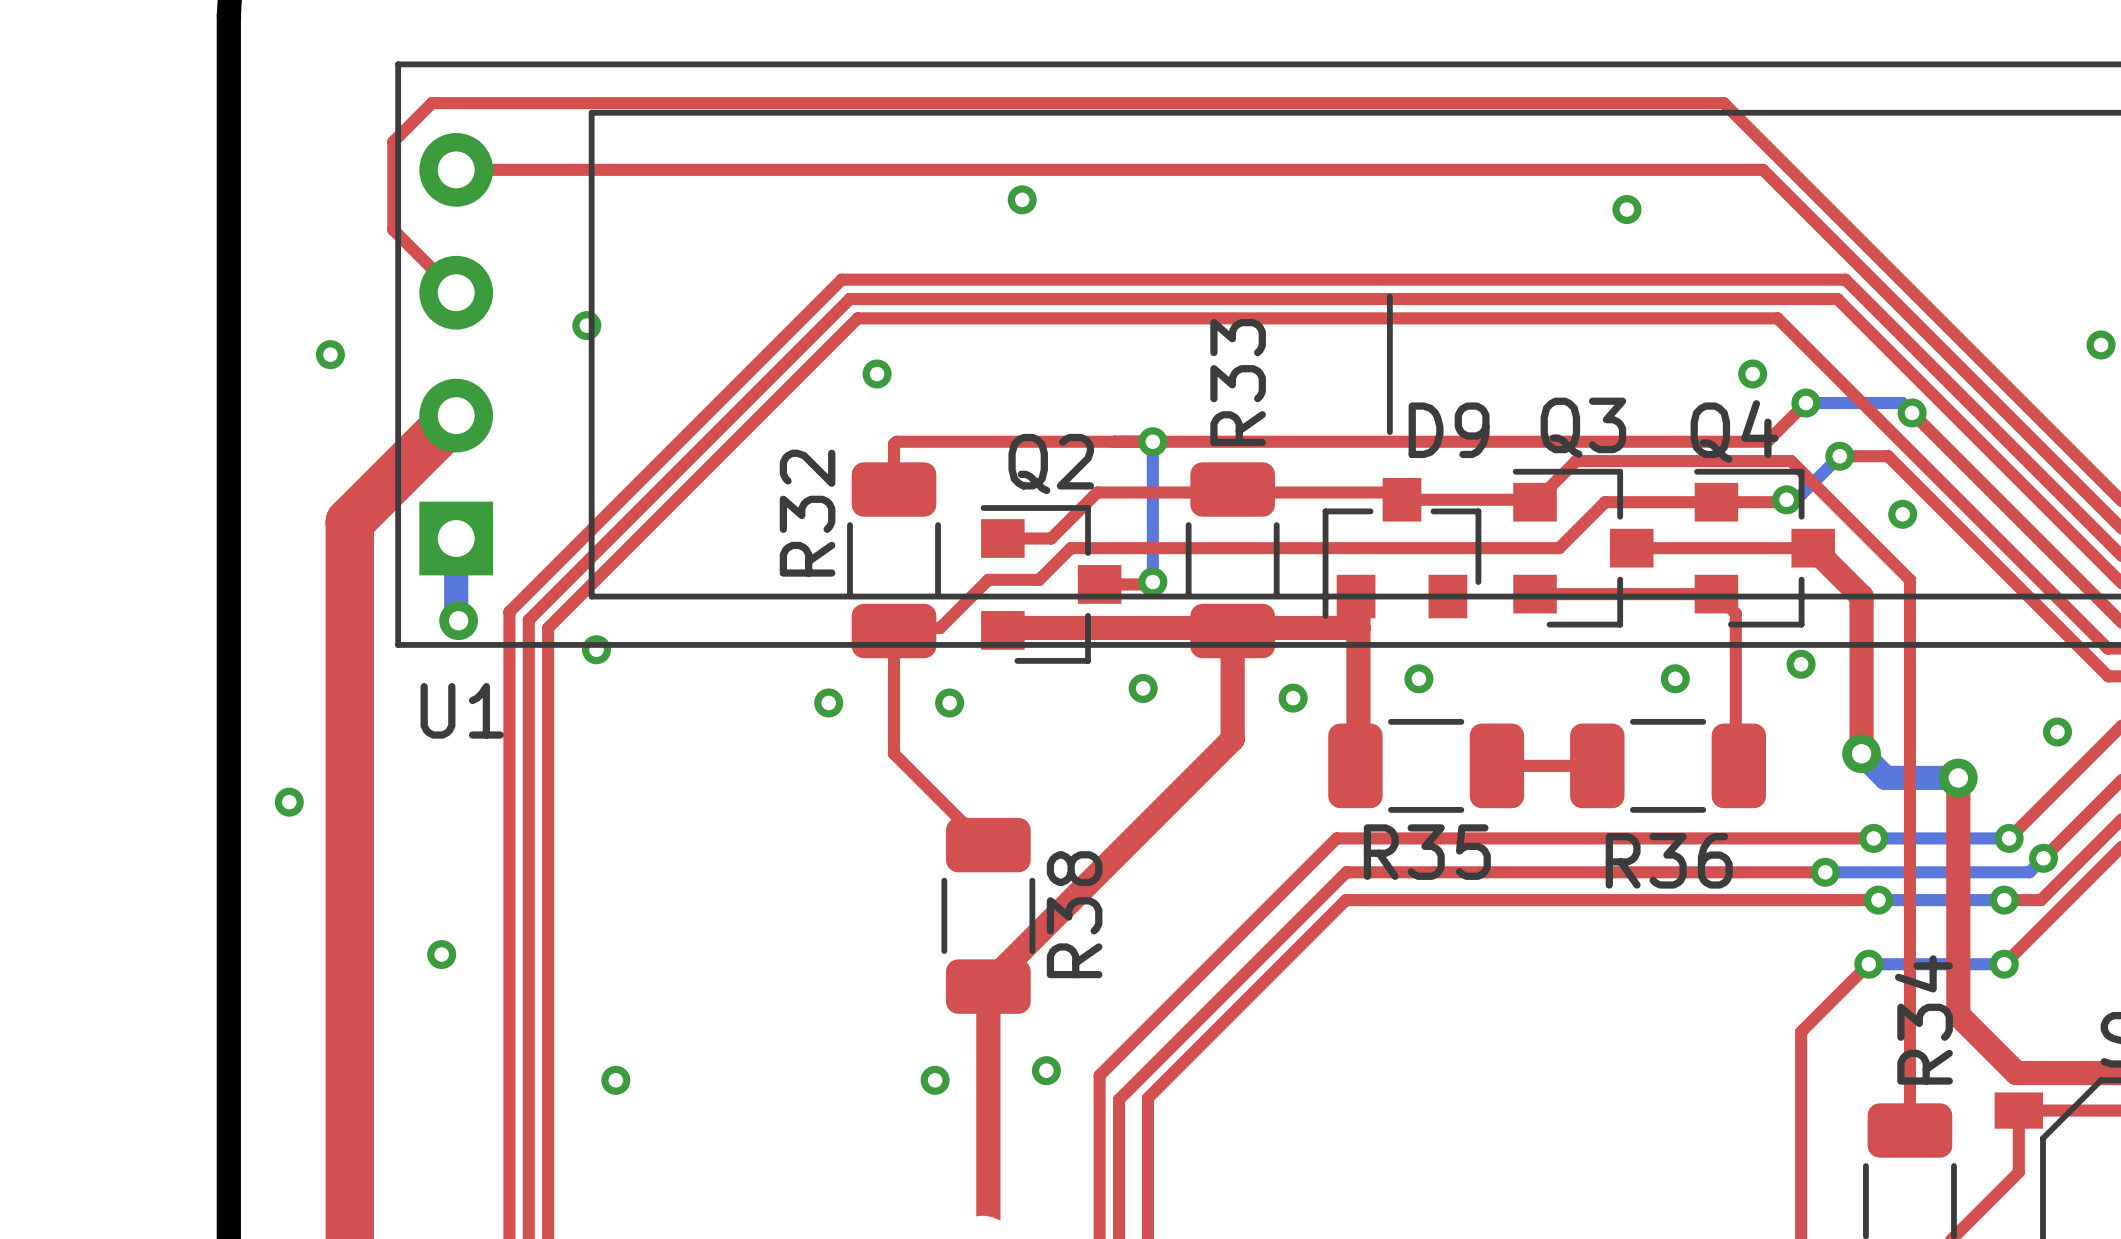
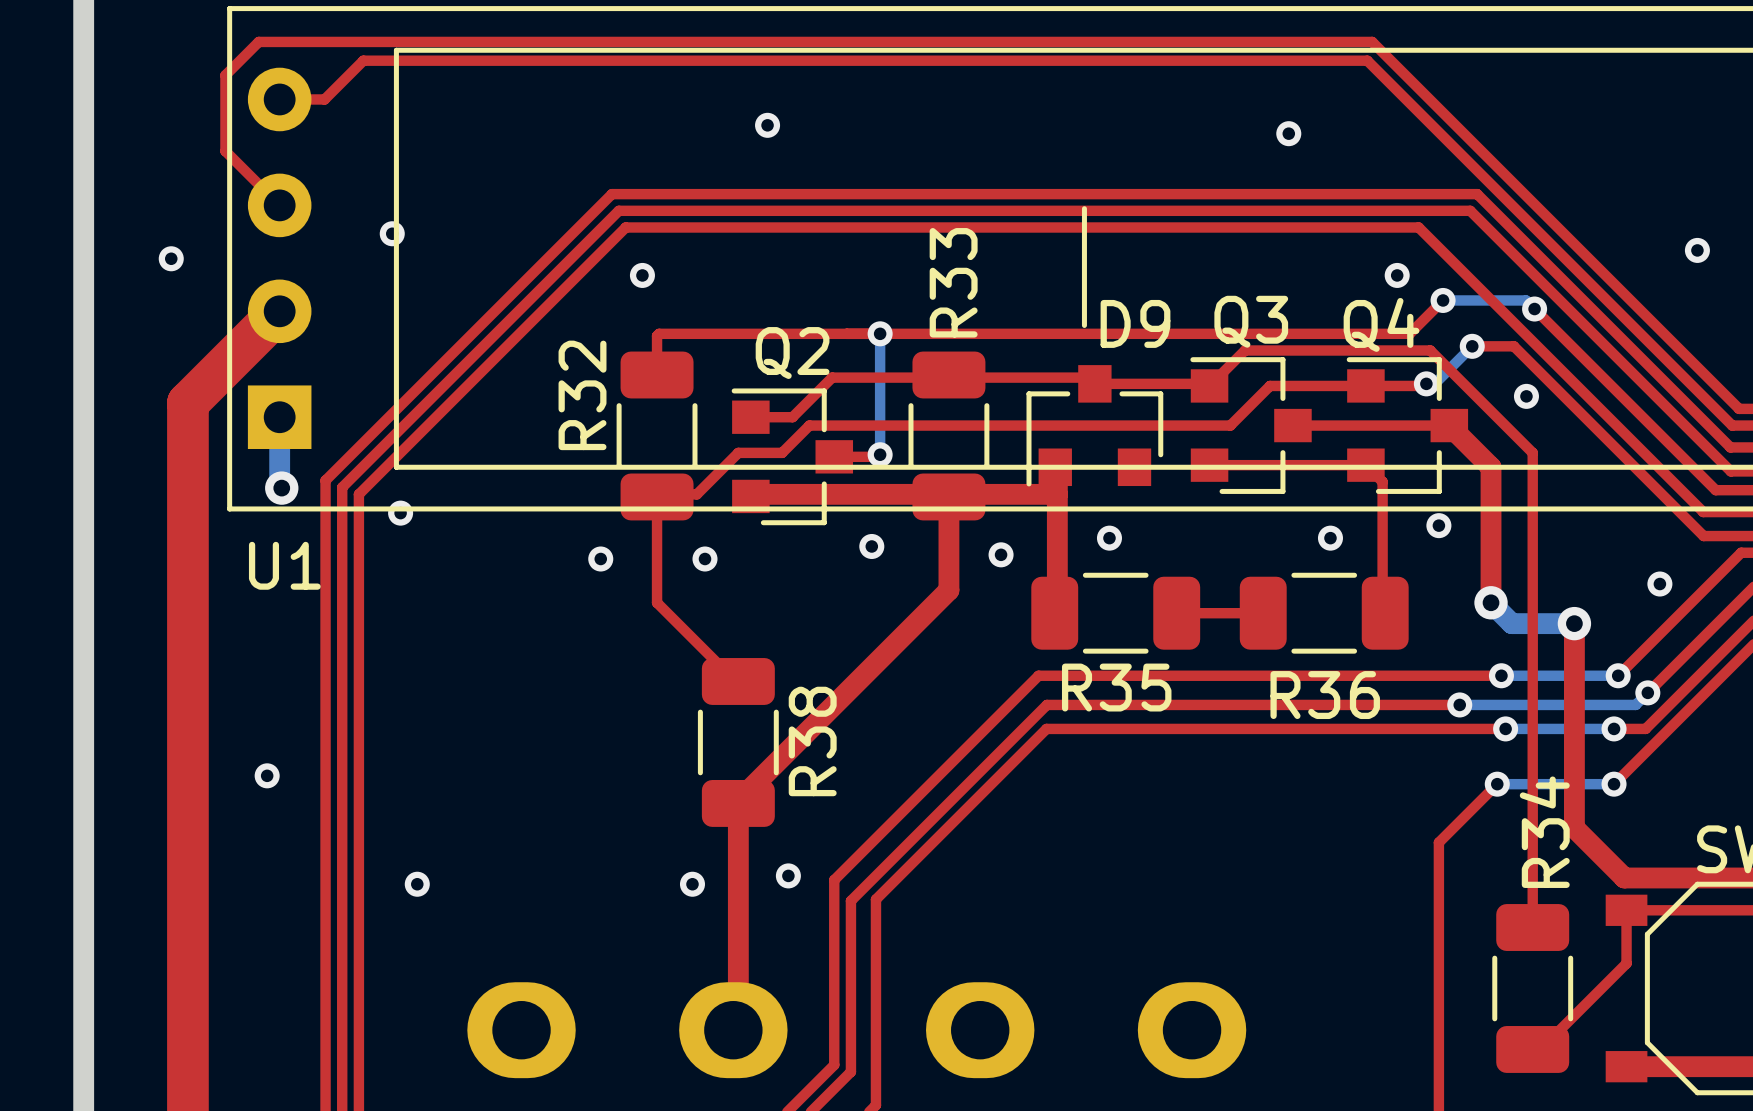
top track: (508, 169) (1763, 169) -> (324, 99) (363, 60) (1367, 60) (1406, 99)
via: (289, 802) -> none

